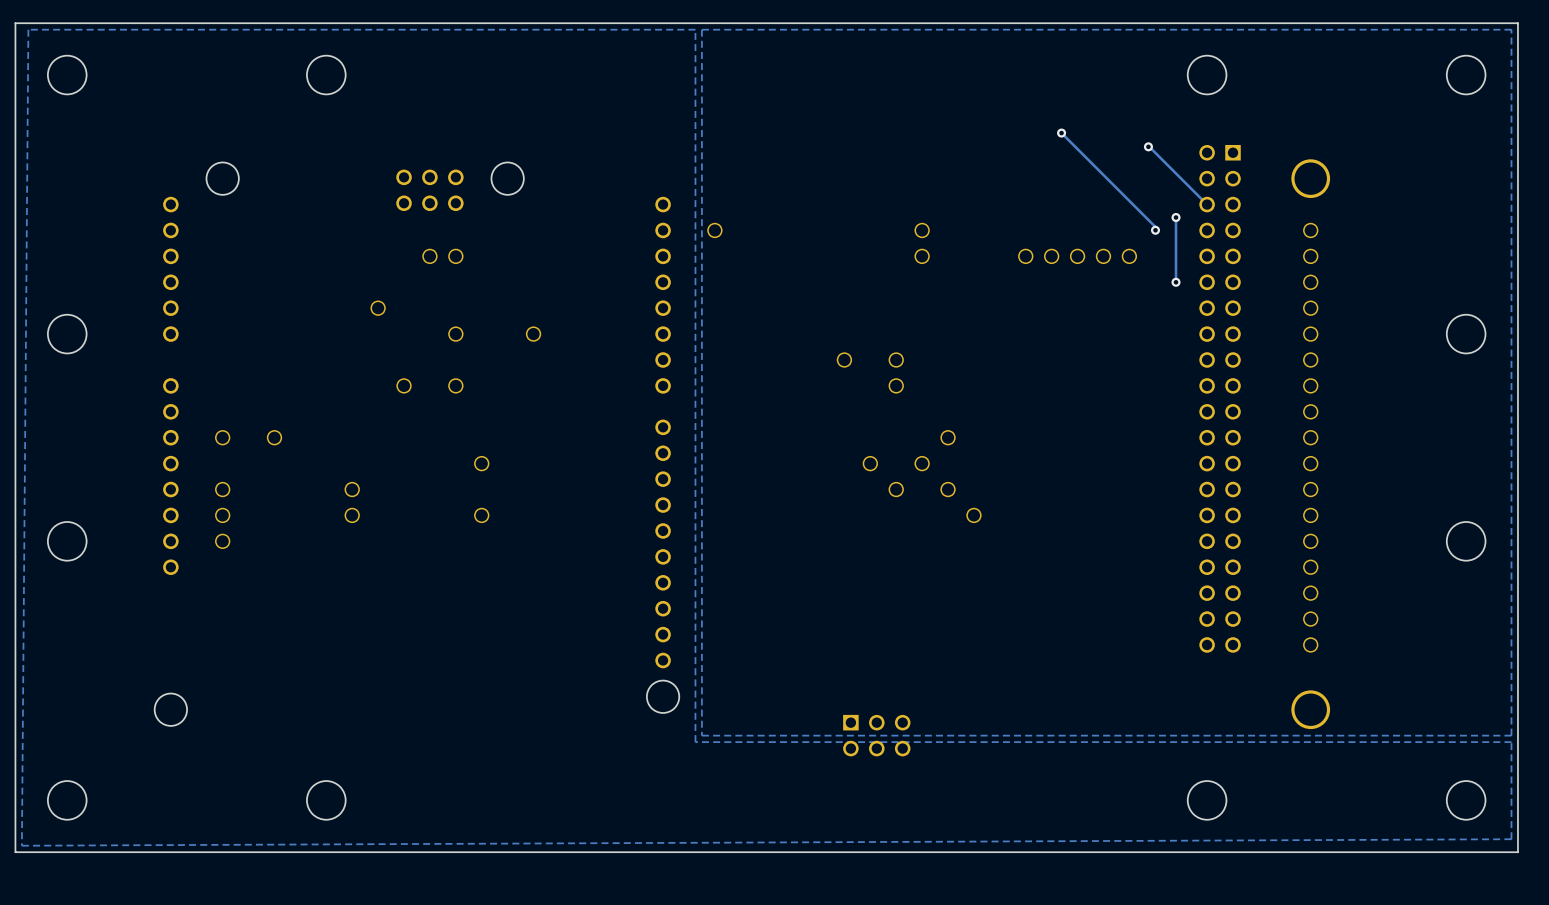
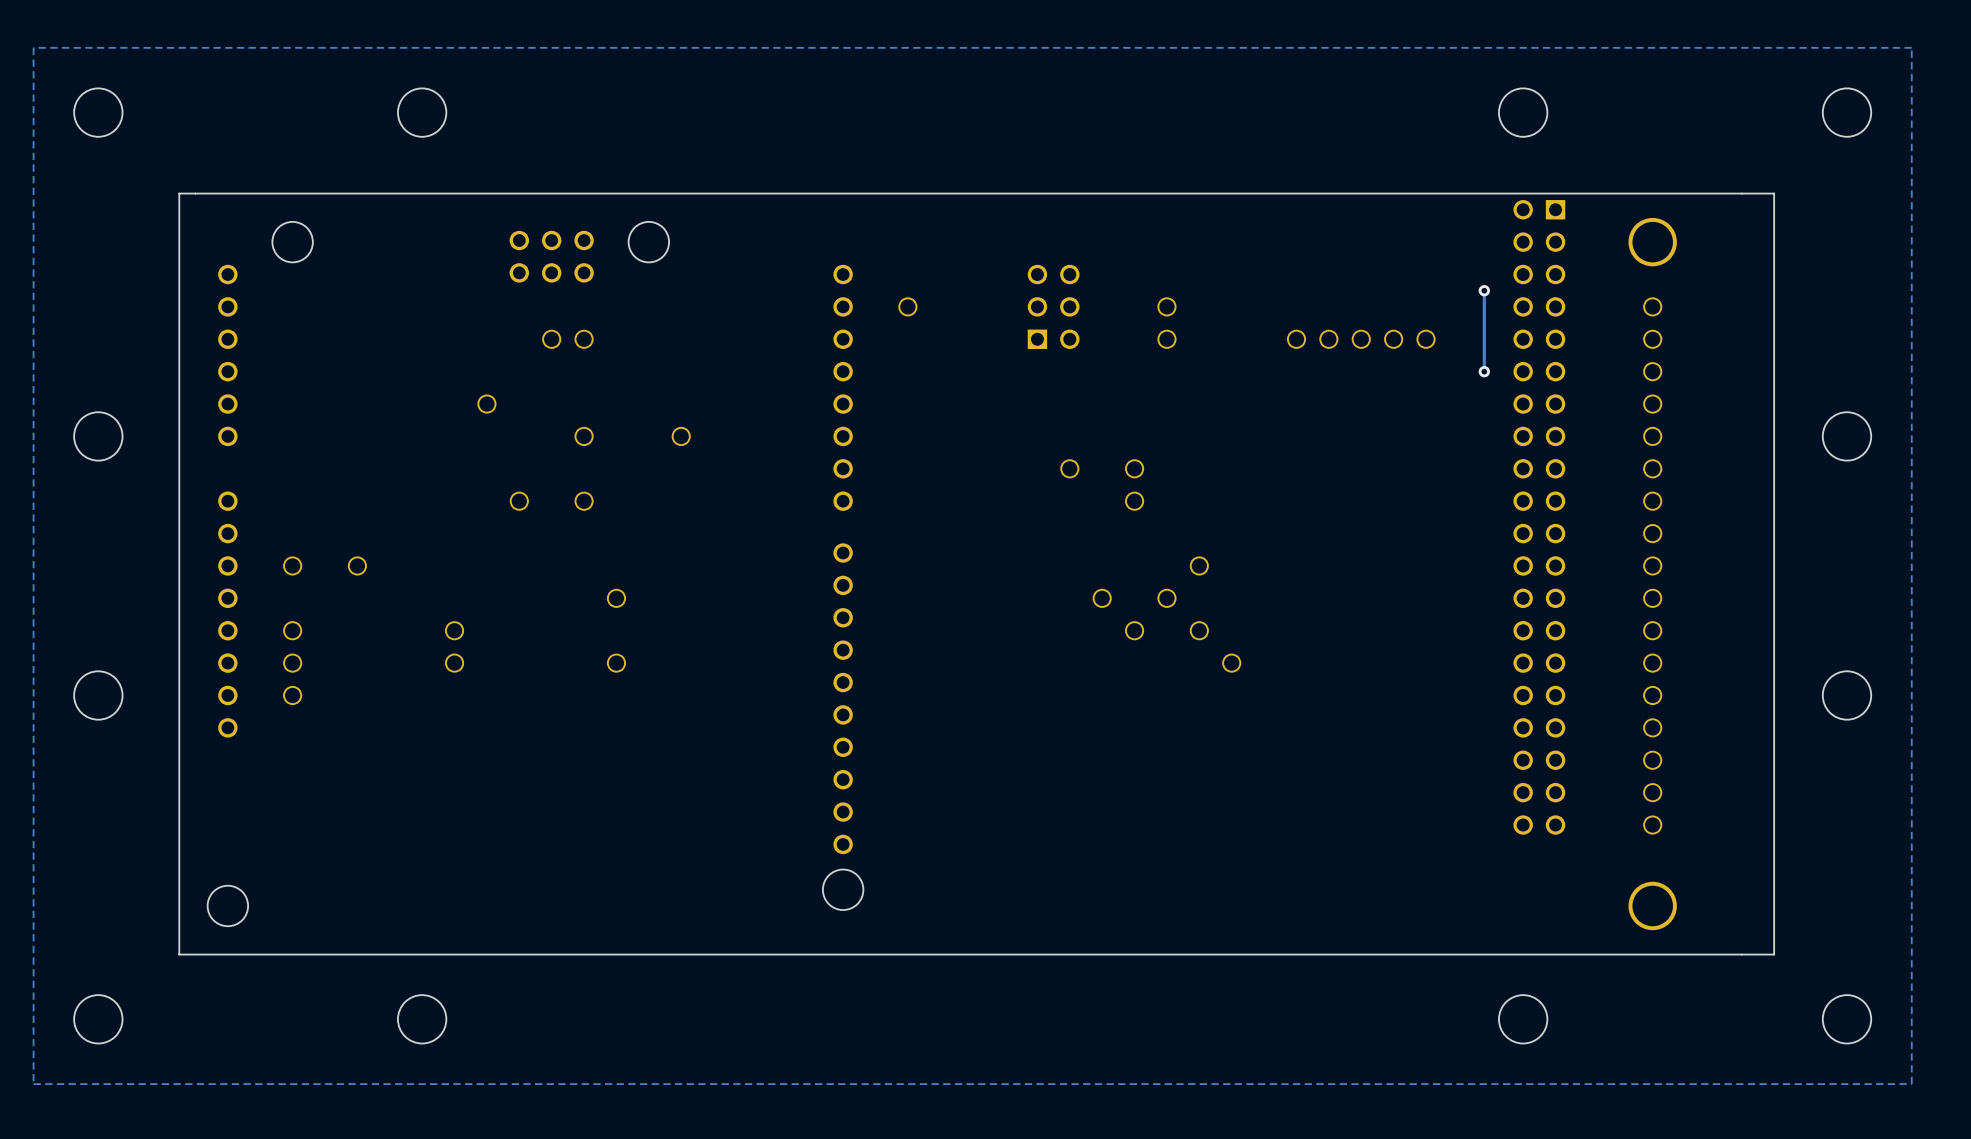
board edge: (1517, 23) (1517, 852) (15, 852) (15, 23) (1517, 23) -> (1774, 193) (1774, 954) (179, 954) (179, 193) (1774, 193)
zone outline: (695, 29) (28, 29) (21, 845) (1511, 839) (1511, 742) (695, 742) (695, 29) -> (1911, 47) (1911, 1084) (33, 1084) (33, 47) (1911, 47)
zone outline: (1511, 29) (1511, 735) (701, 735) (701, 29) (1511, 29) -> none
track: (1061, 133) (1155, 227) (1155, 230) -> none
via: (1061, 133) -> none
track: (1148, 146) (1207, 204) -> none
via: (1148, 146) -> none
part: none -> (1053, 306)
via: (1155, 230) -> none
part: (876, 735) -> none

